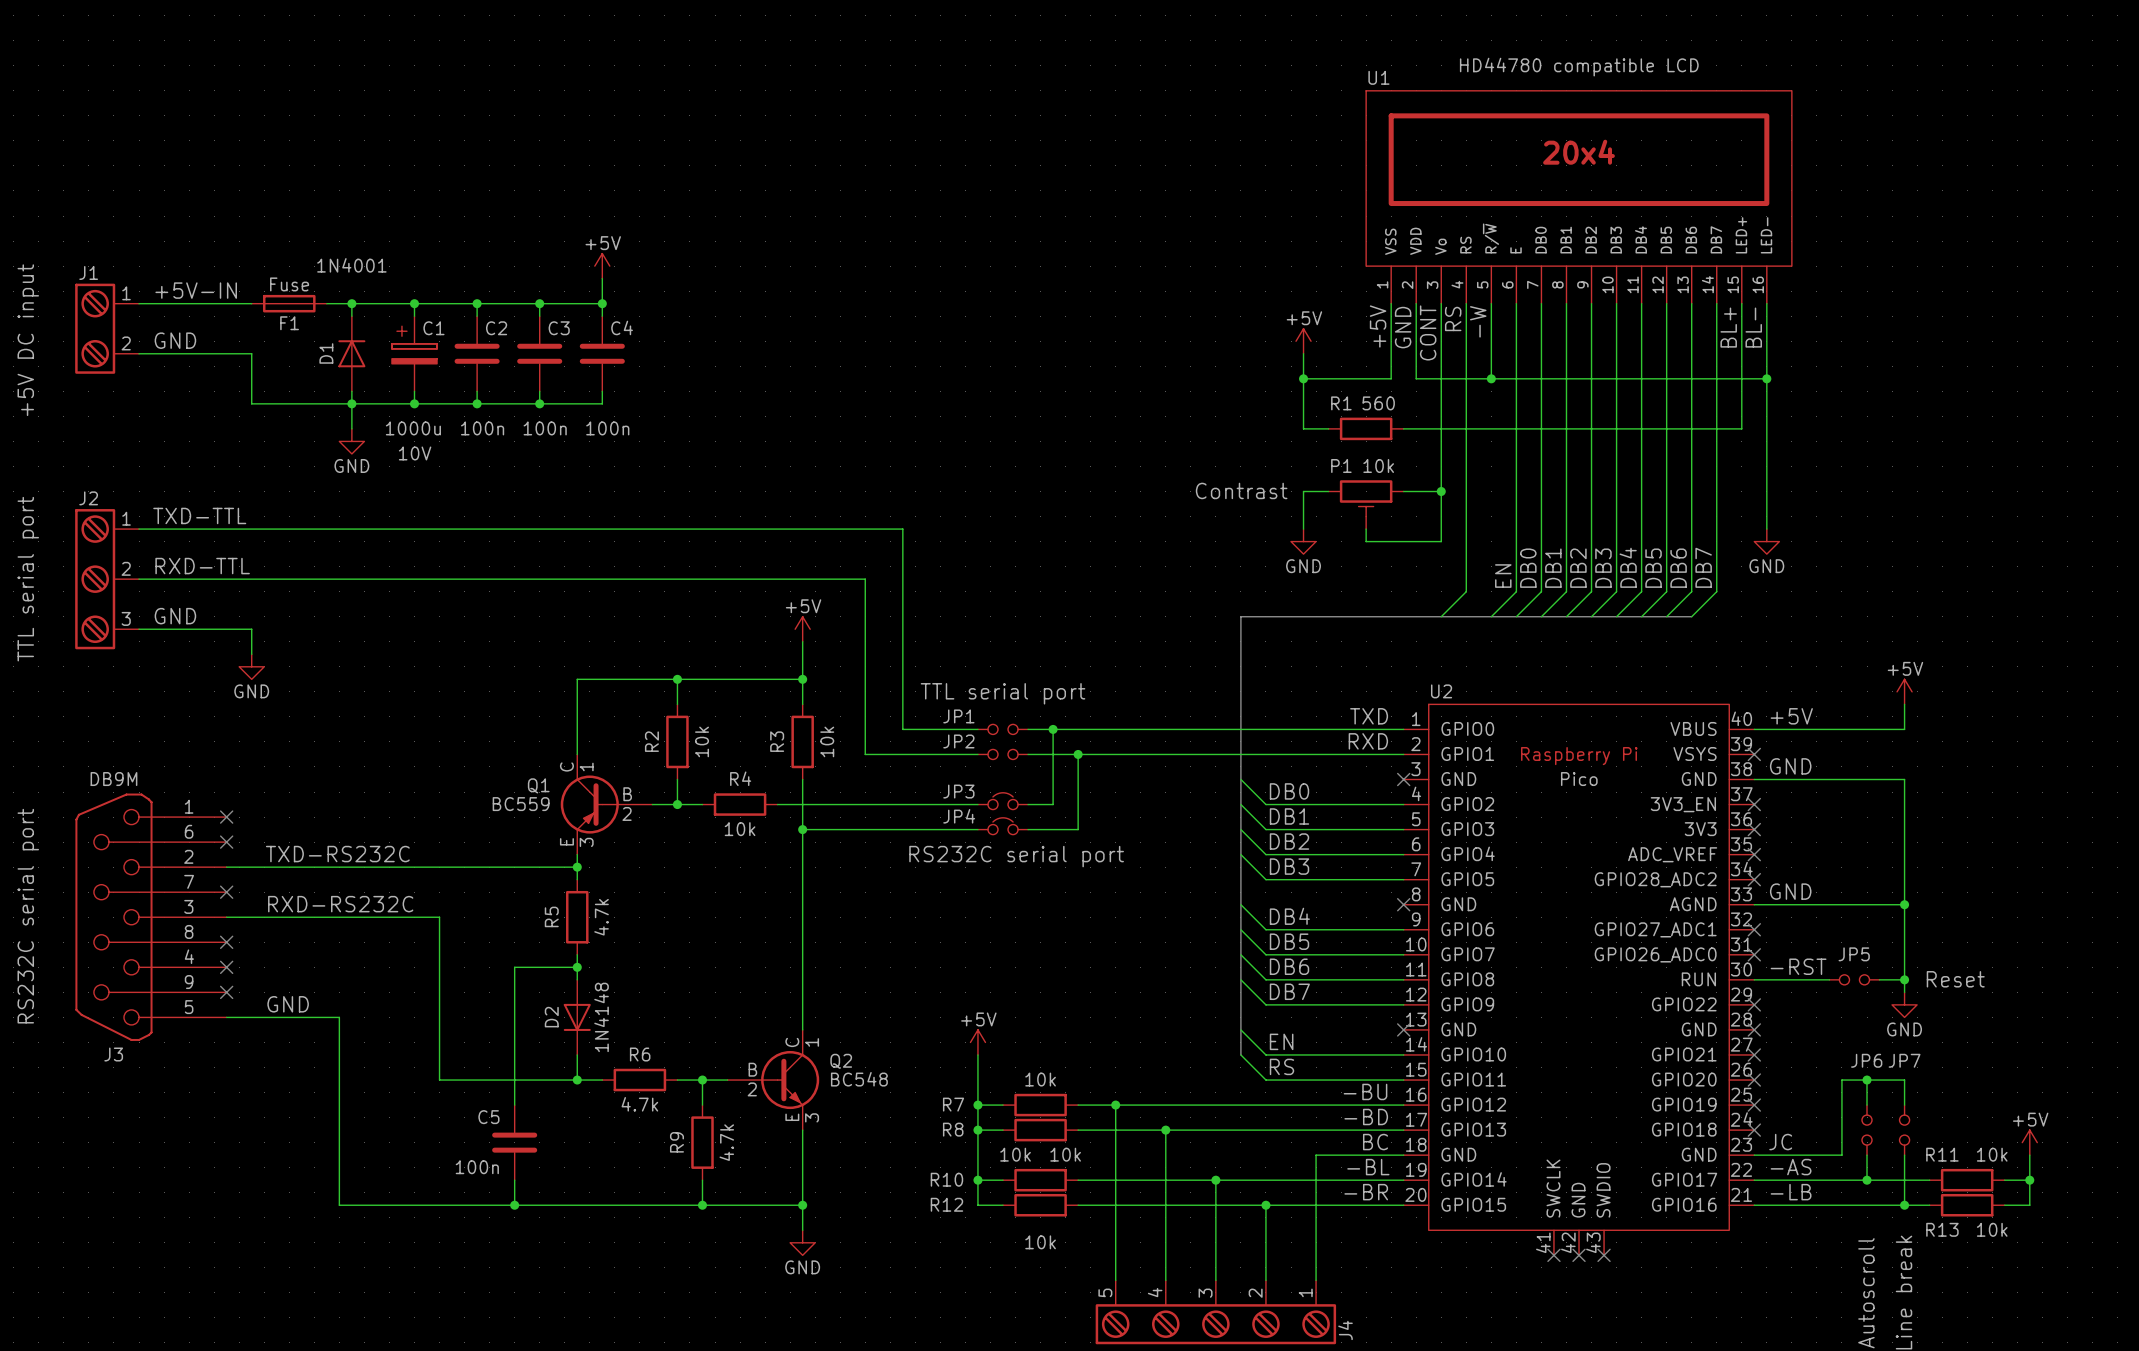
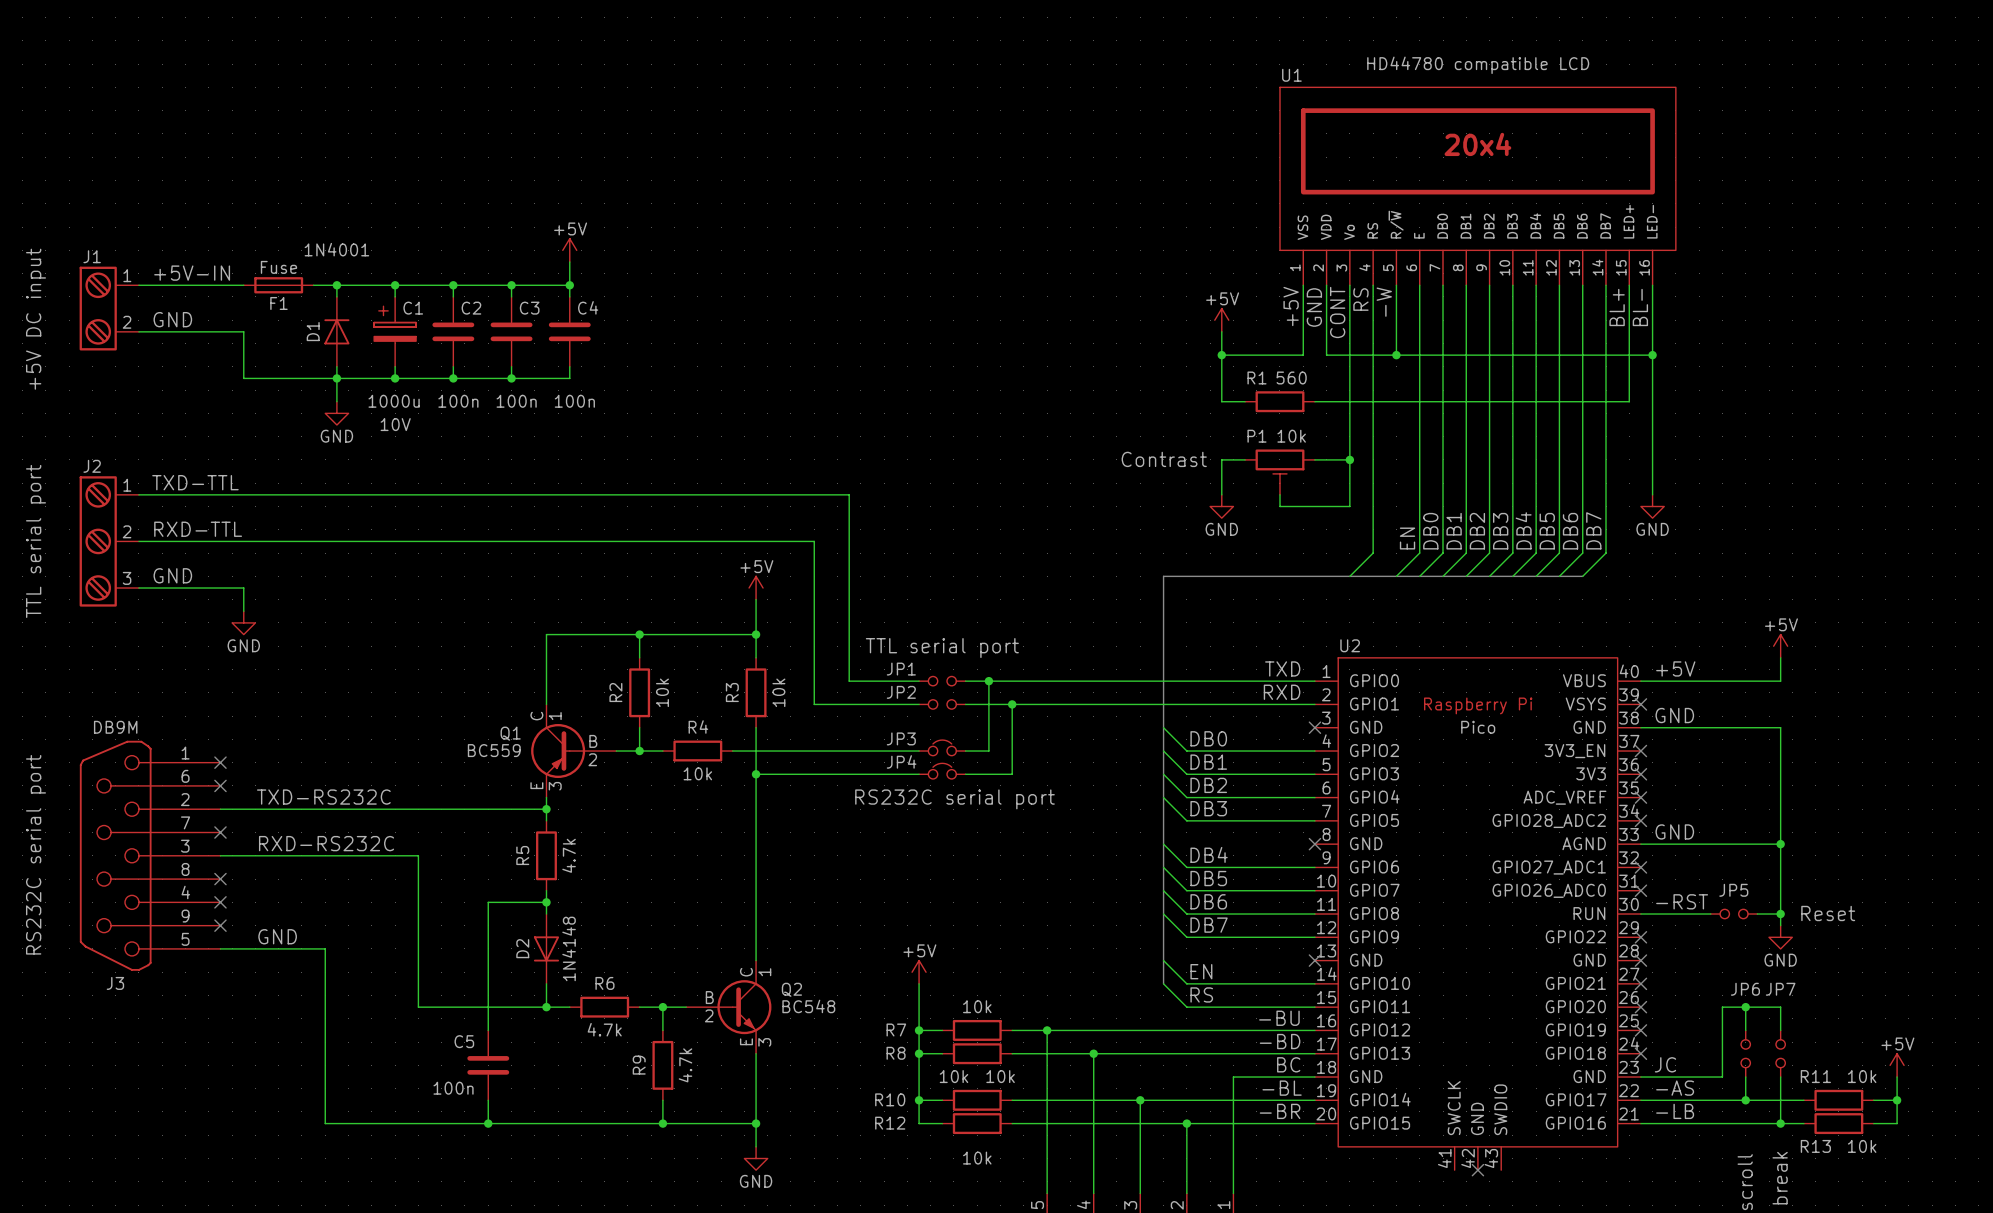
no-connect mark: (1553, 1255) -> none
no-connect mark: (1604, 1255) -> none

